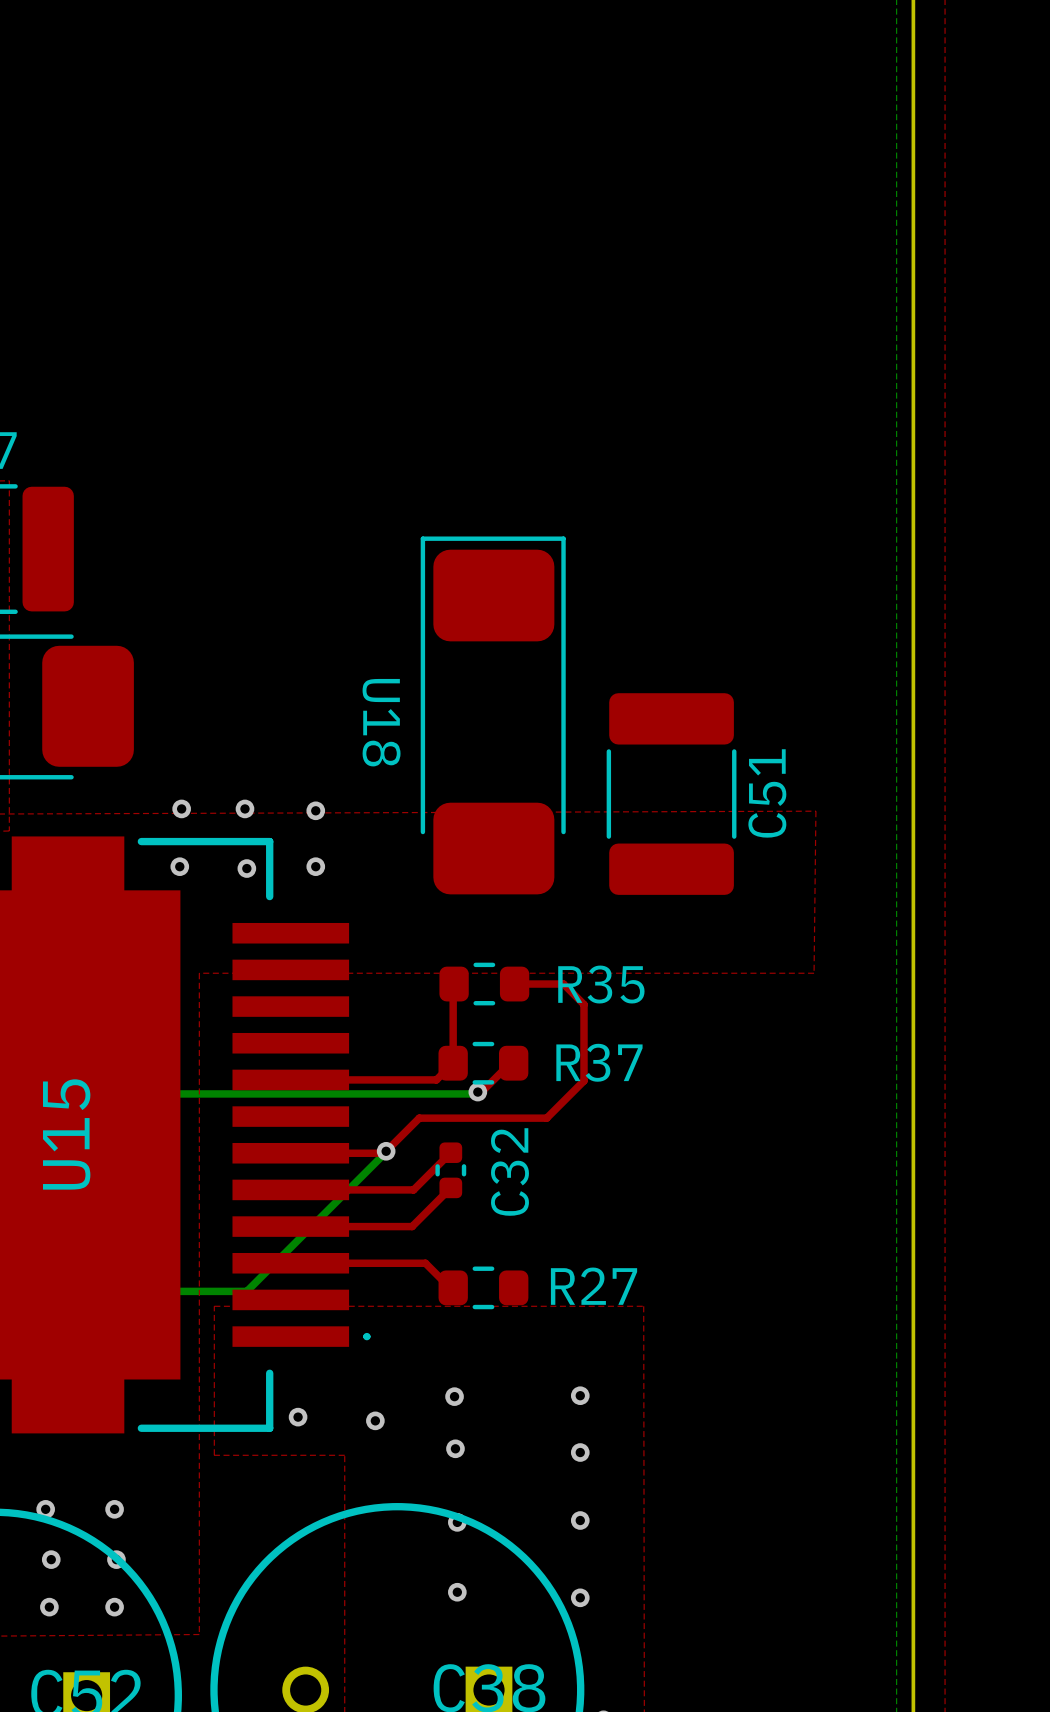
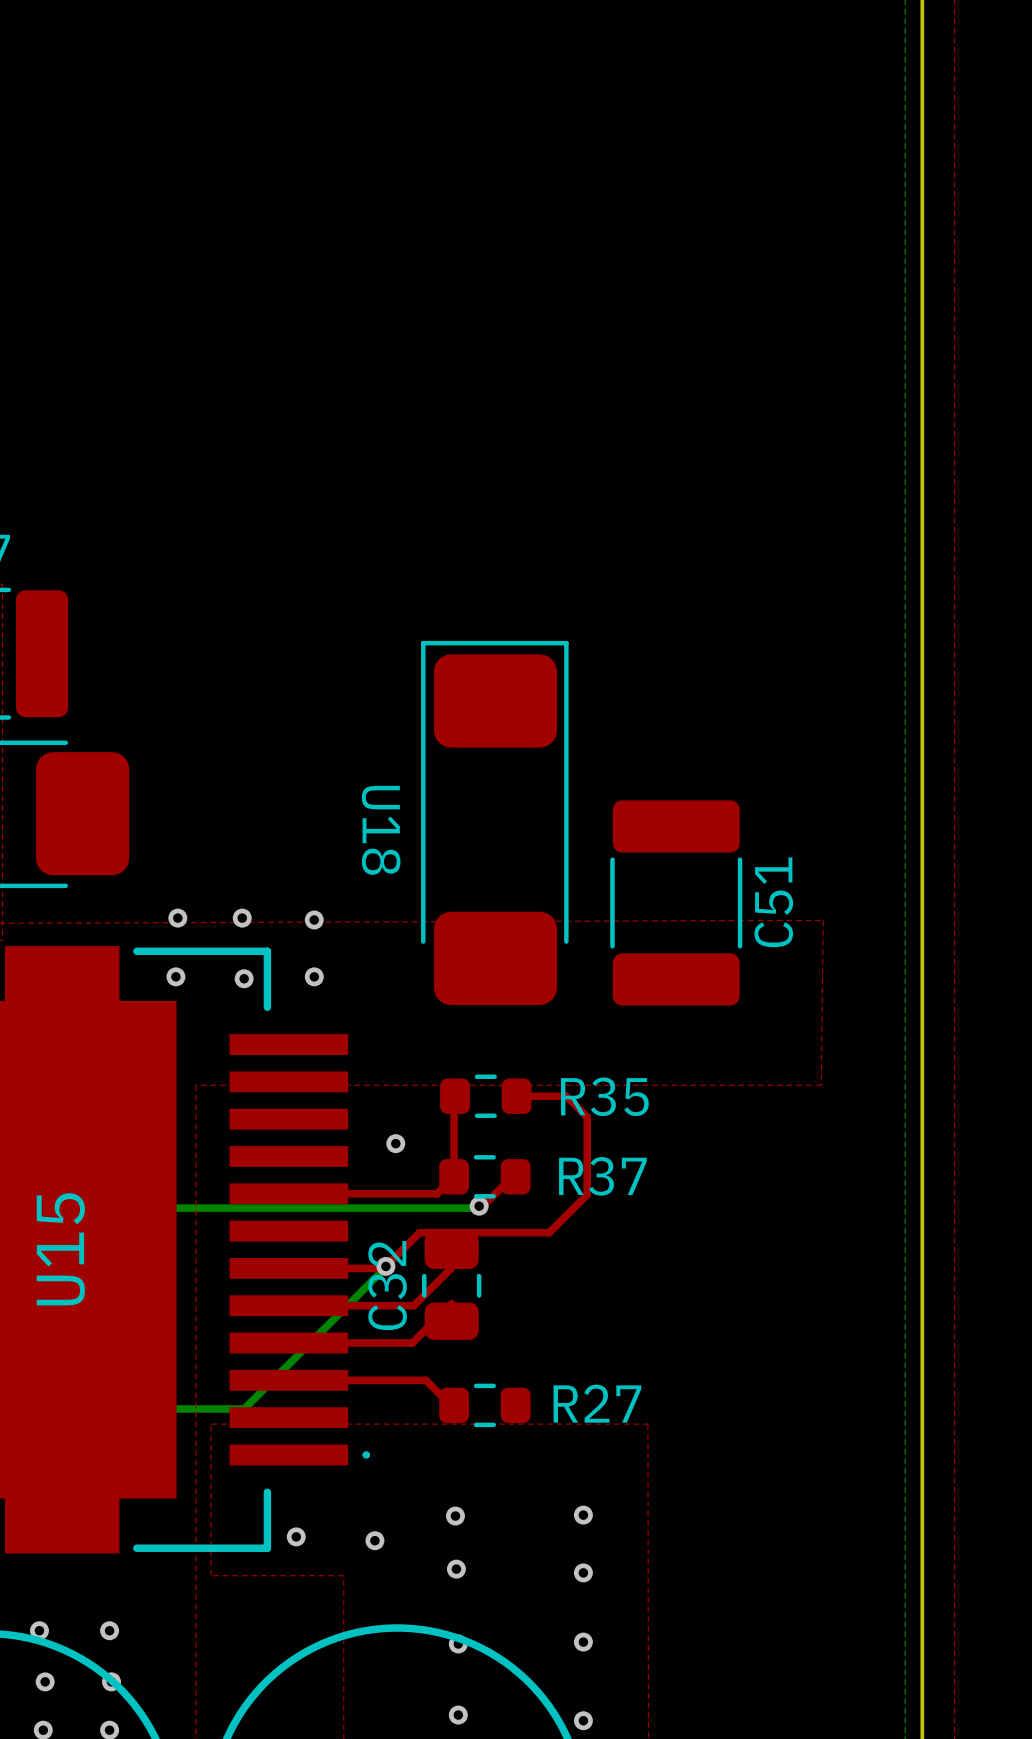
via: none -> (395, 1143)
C32 footprint: [435, 1142, 467, 1199] -> [422, 1231, 482, 1340]
C32 name position: C32 (509, 1171) -> C32 (387, 1285)

